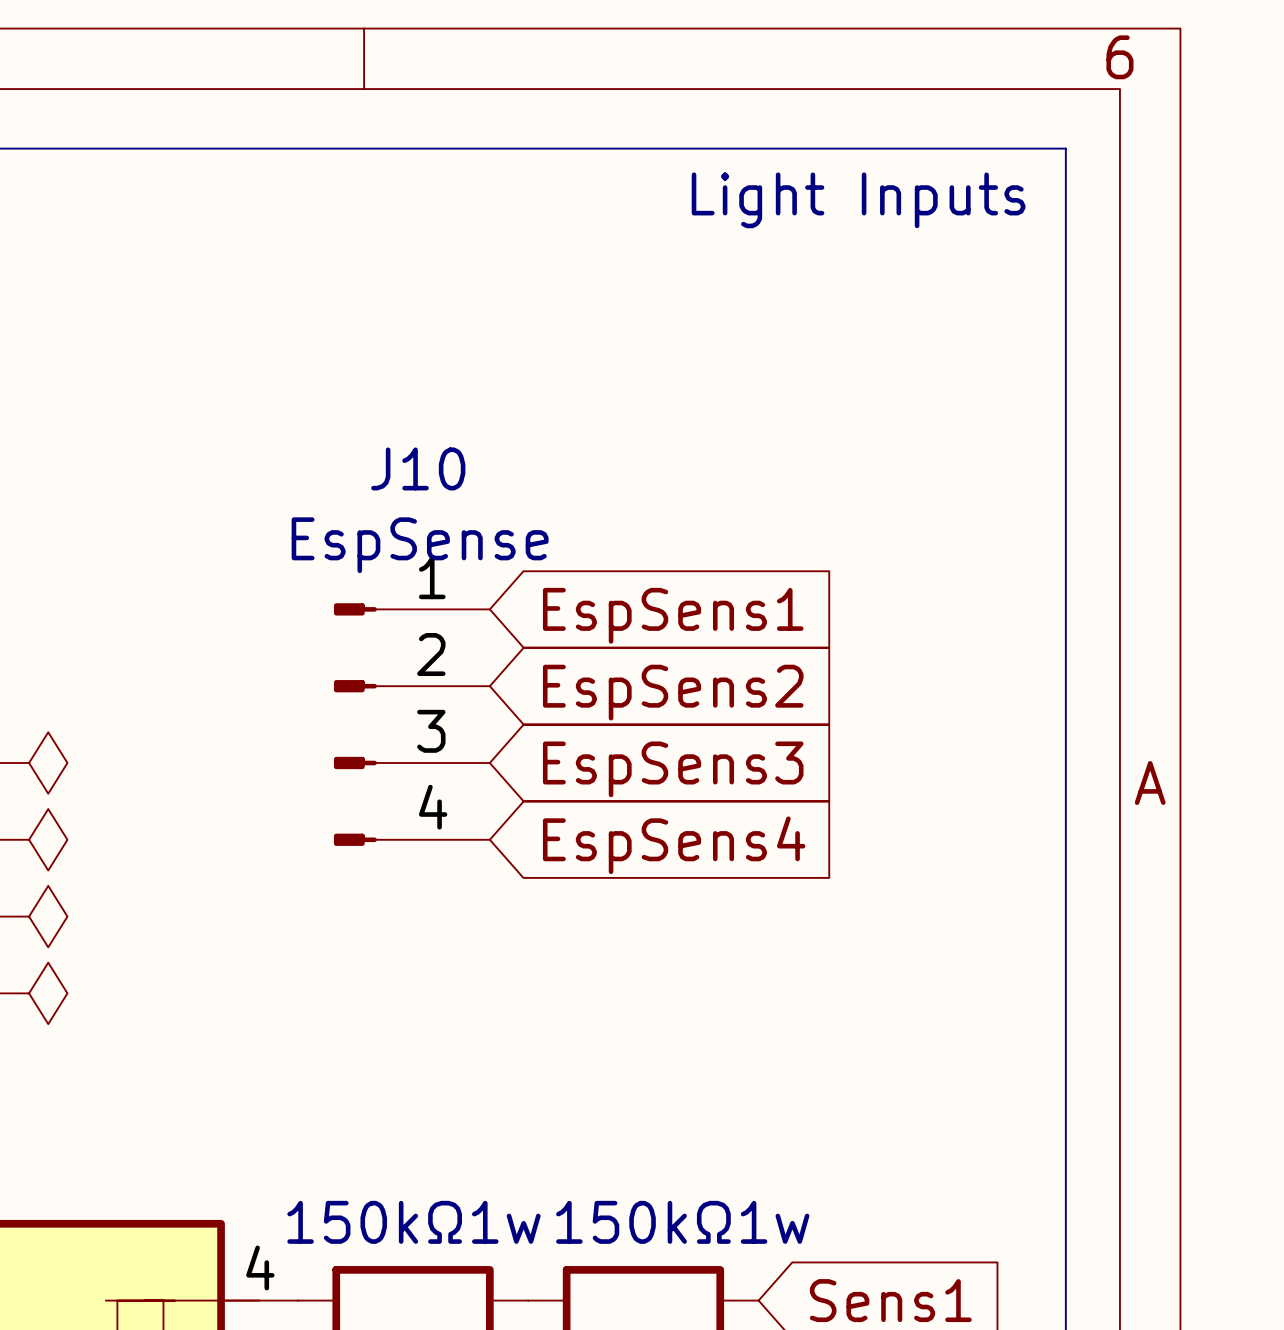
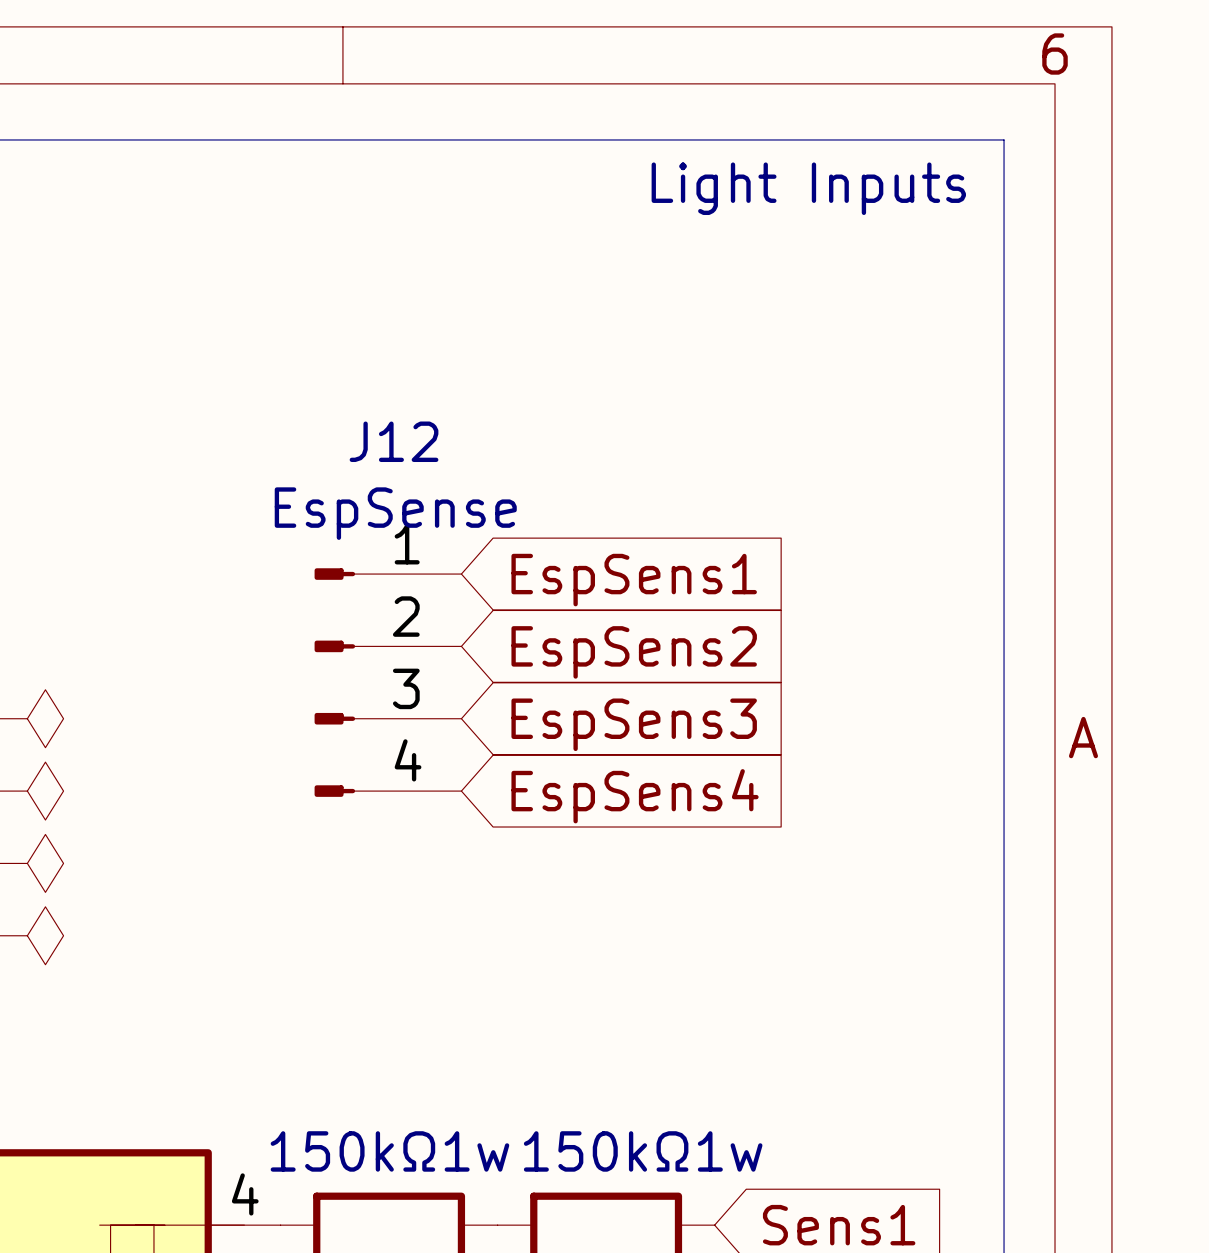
J10 name: J10 (418, 468) -> J12 (394, 441)

